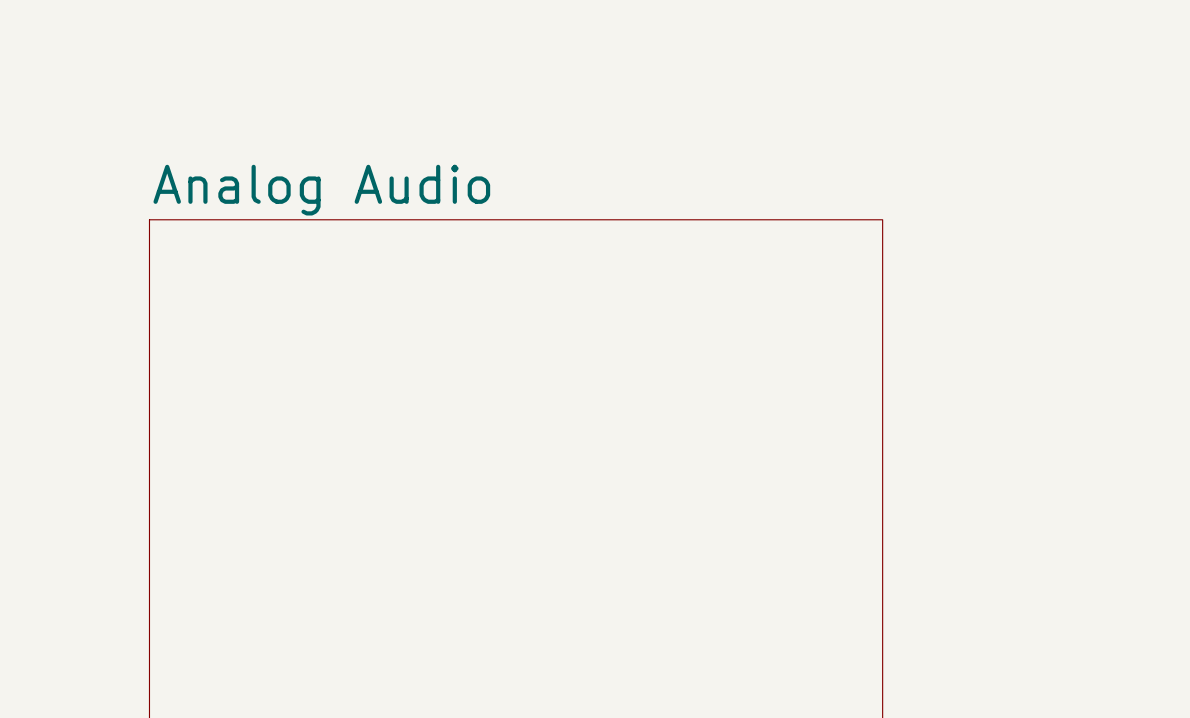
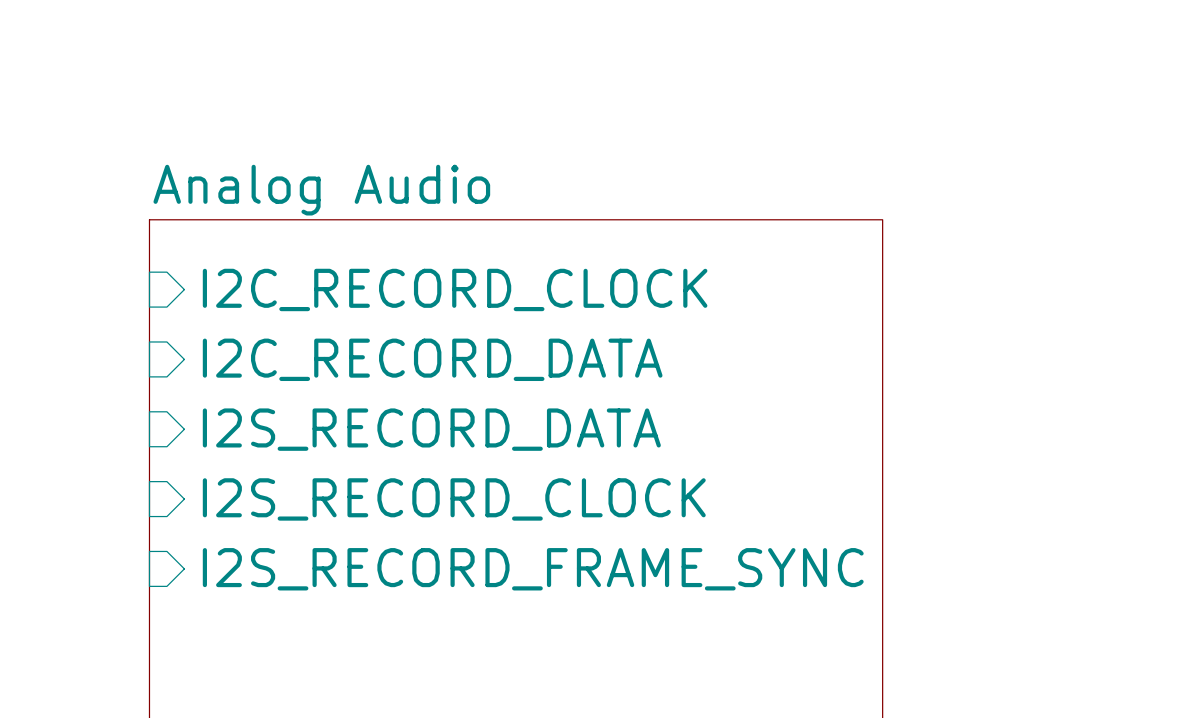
sheet pin: none -> I2C_RECORD_CLOCK (455, 289)
sheet pin: none -> I2C_RECORD_DATA (432, 359)
sheet pin: none -> I2S_RECORD_DATA (431, 429)
sheet pin: none -> I2S_RECORD_CLOCK (454, 499)
sheet pin: none -> I2S_RECORD_FRAME_SYNC (533, 569)

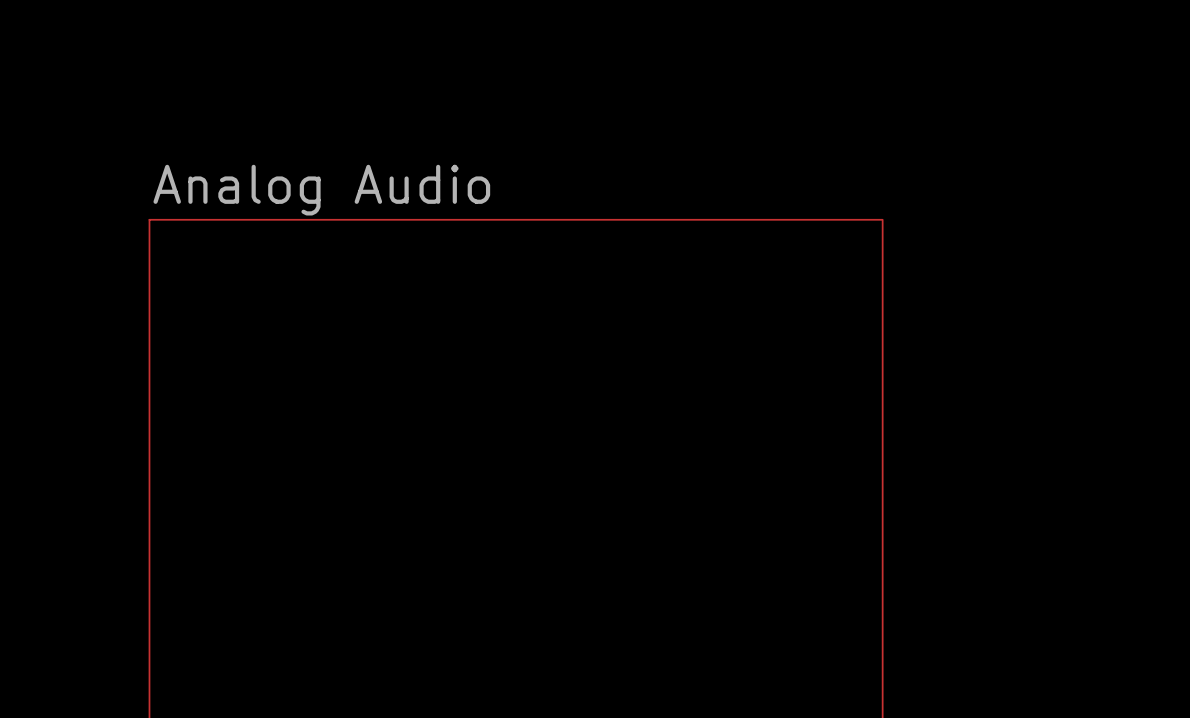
sheet pin: I2C_RECORD_CLOCK (455, 289) -> none
sheet pin: I2C_RECORD_DATA (432, 359) -> none
sheet pin: I2S_RECORD_DATA (431, 429) -> none
sheet pin: I2S_RECORD_CLOCK (454, 499) -> none
sheet pin: I2S_RECORD_FRAME_SYNC (533, 569) -> none

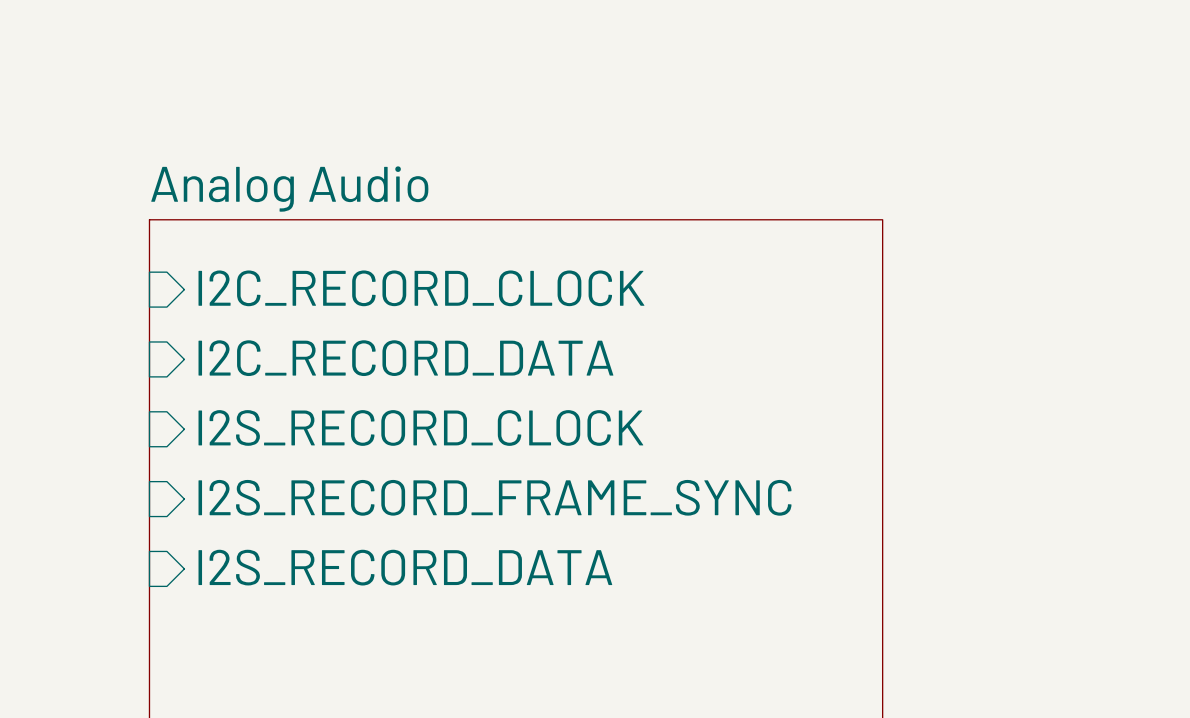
sheet pin: none -> I2C_RECORD_CLOCK (421, 288)
sheet pin: none -> I2C_RECORD_DATA (405, 358)
sheet pin: none -> I2S_RECORD_CLOCK (420, 427)
sheet pin: none -> I2S_RECORD_FRAME_SYNC (494, 497)
sheet pin: none -> I2S_RECORD_DATA (405, 567)

